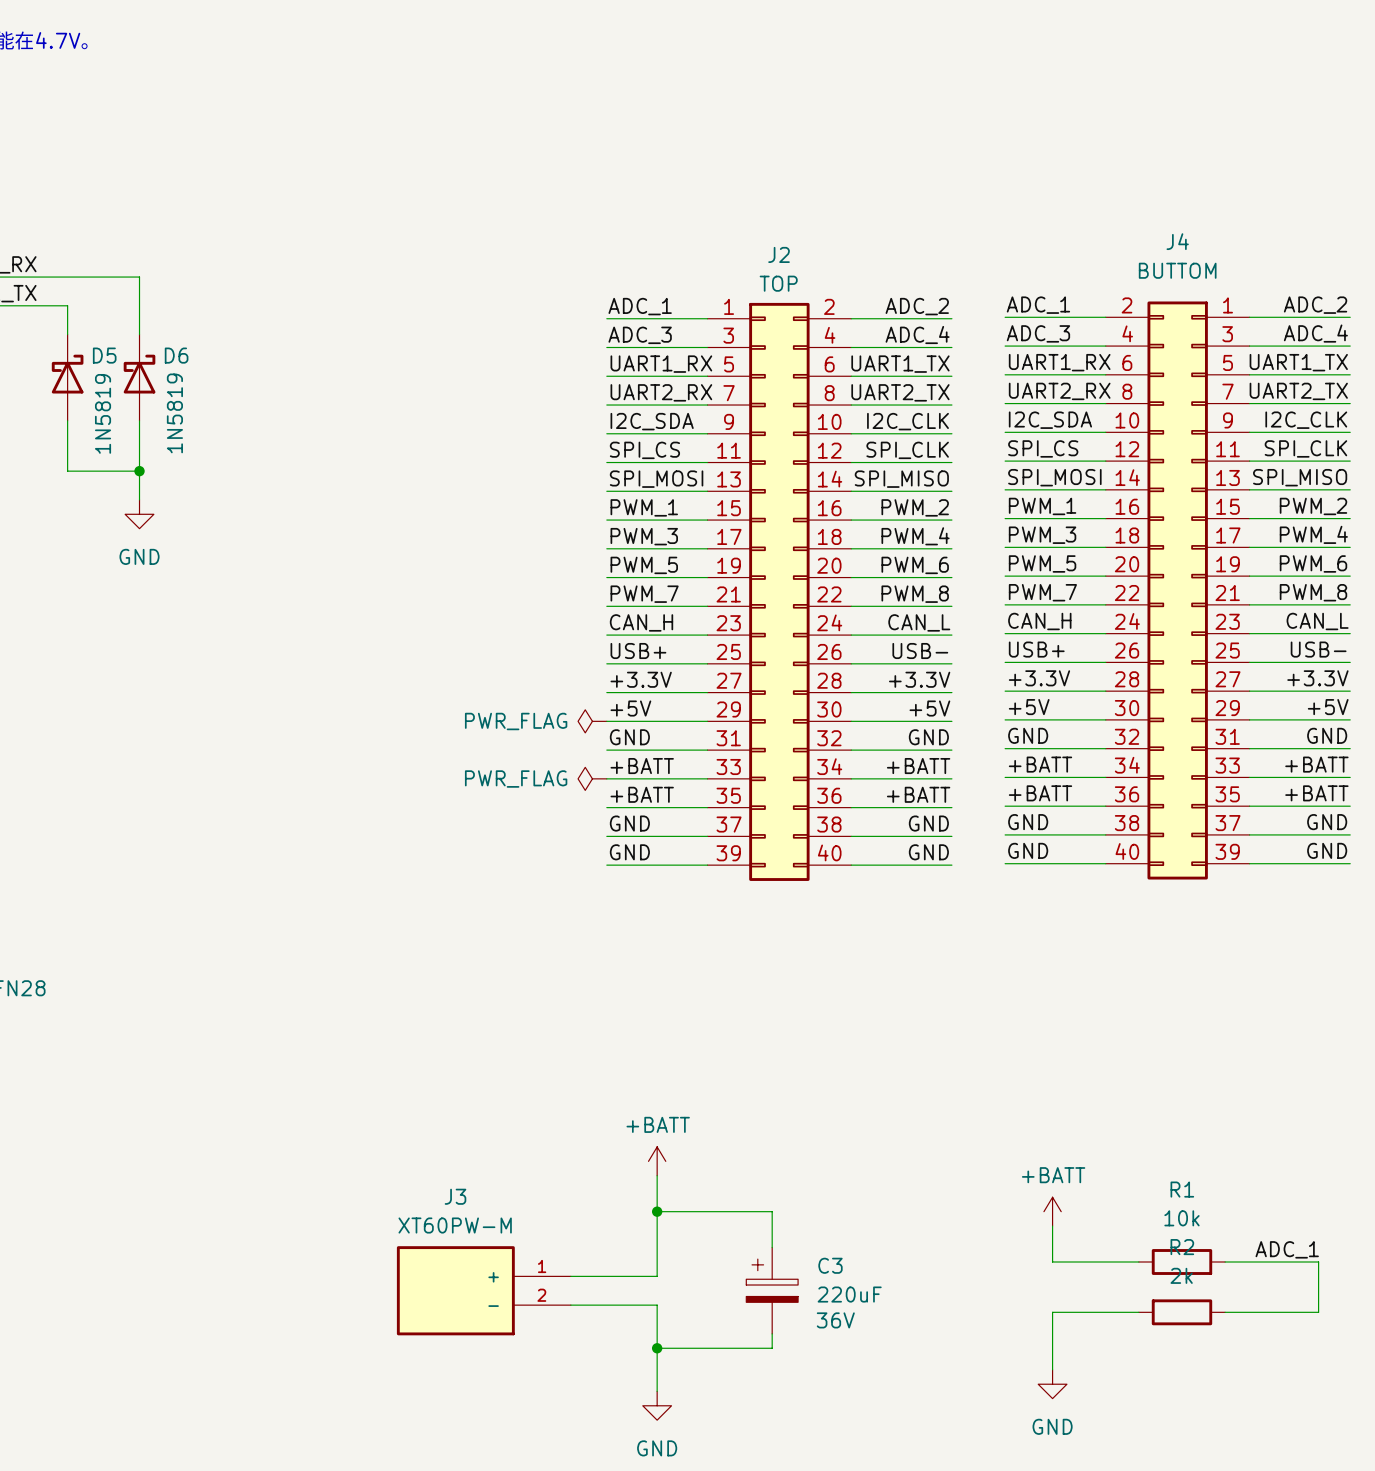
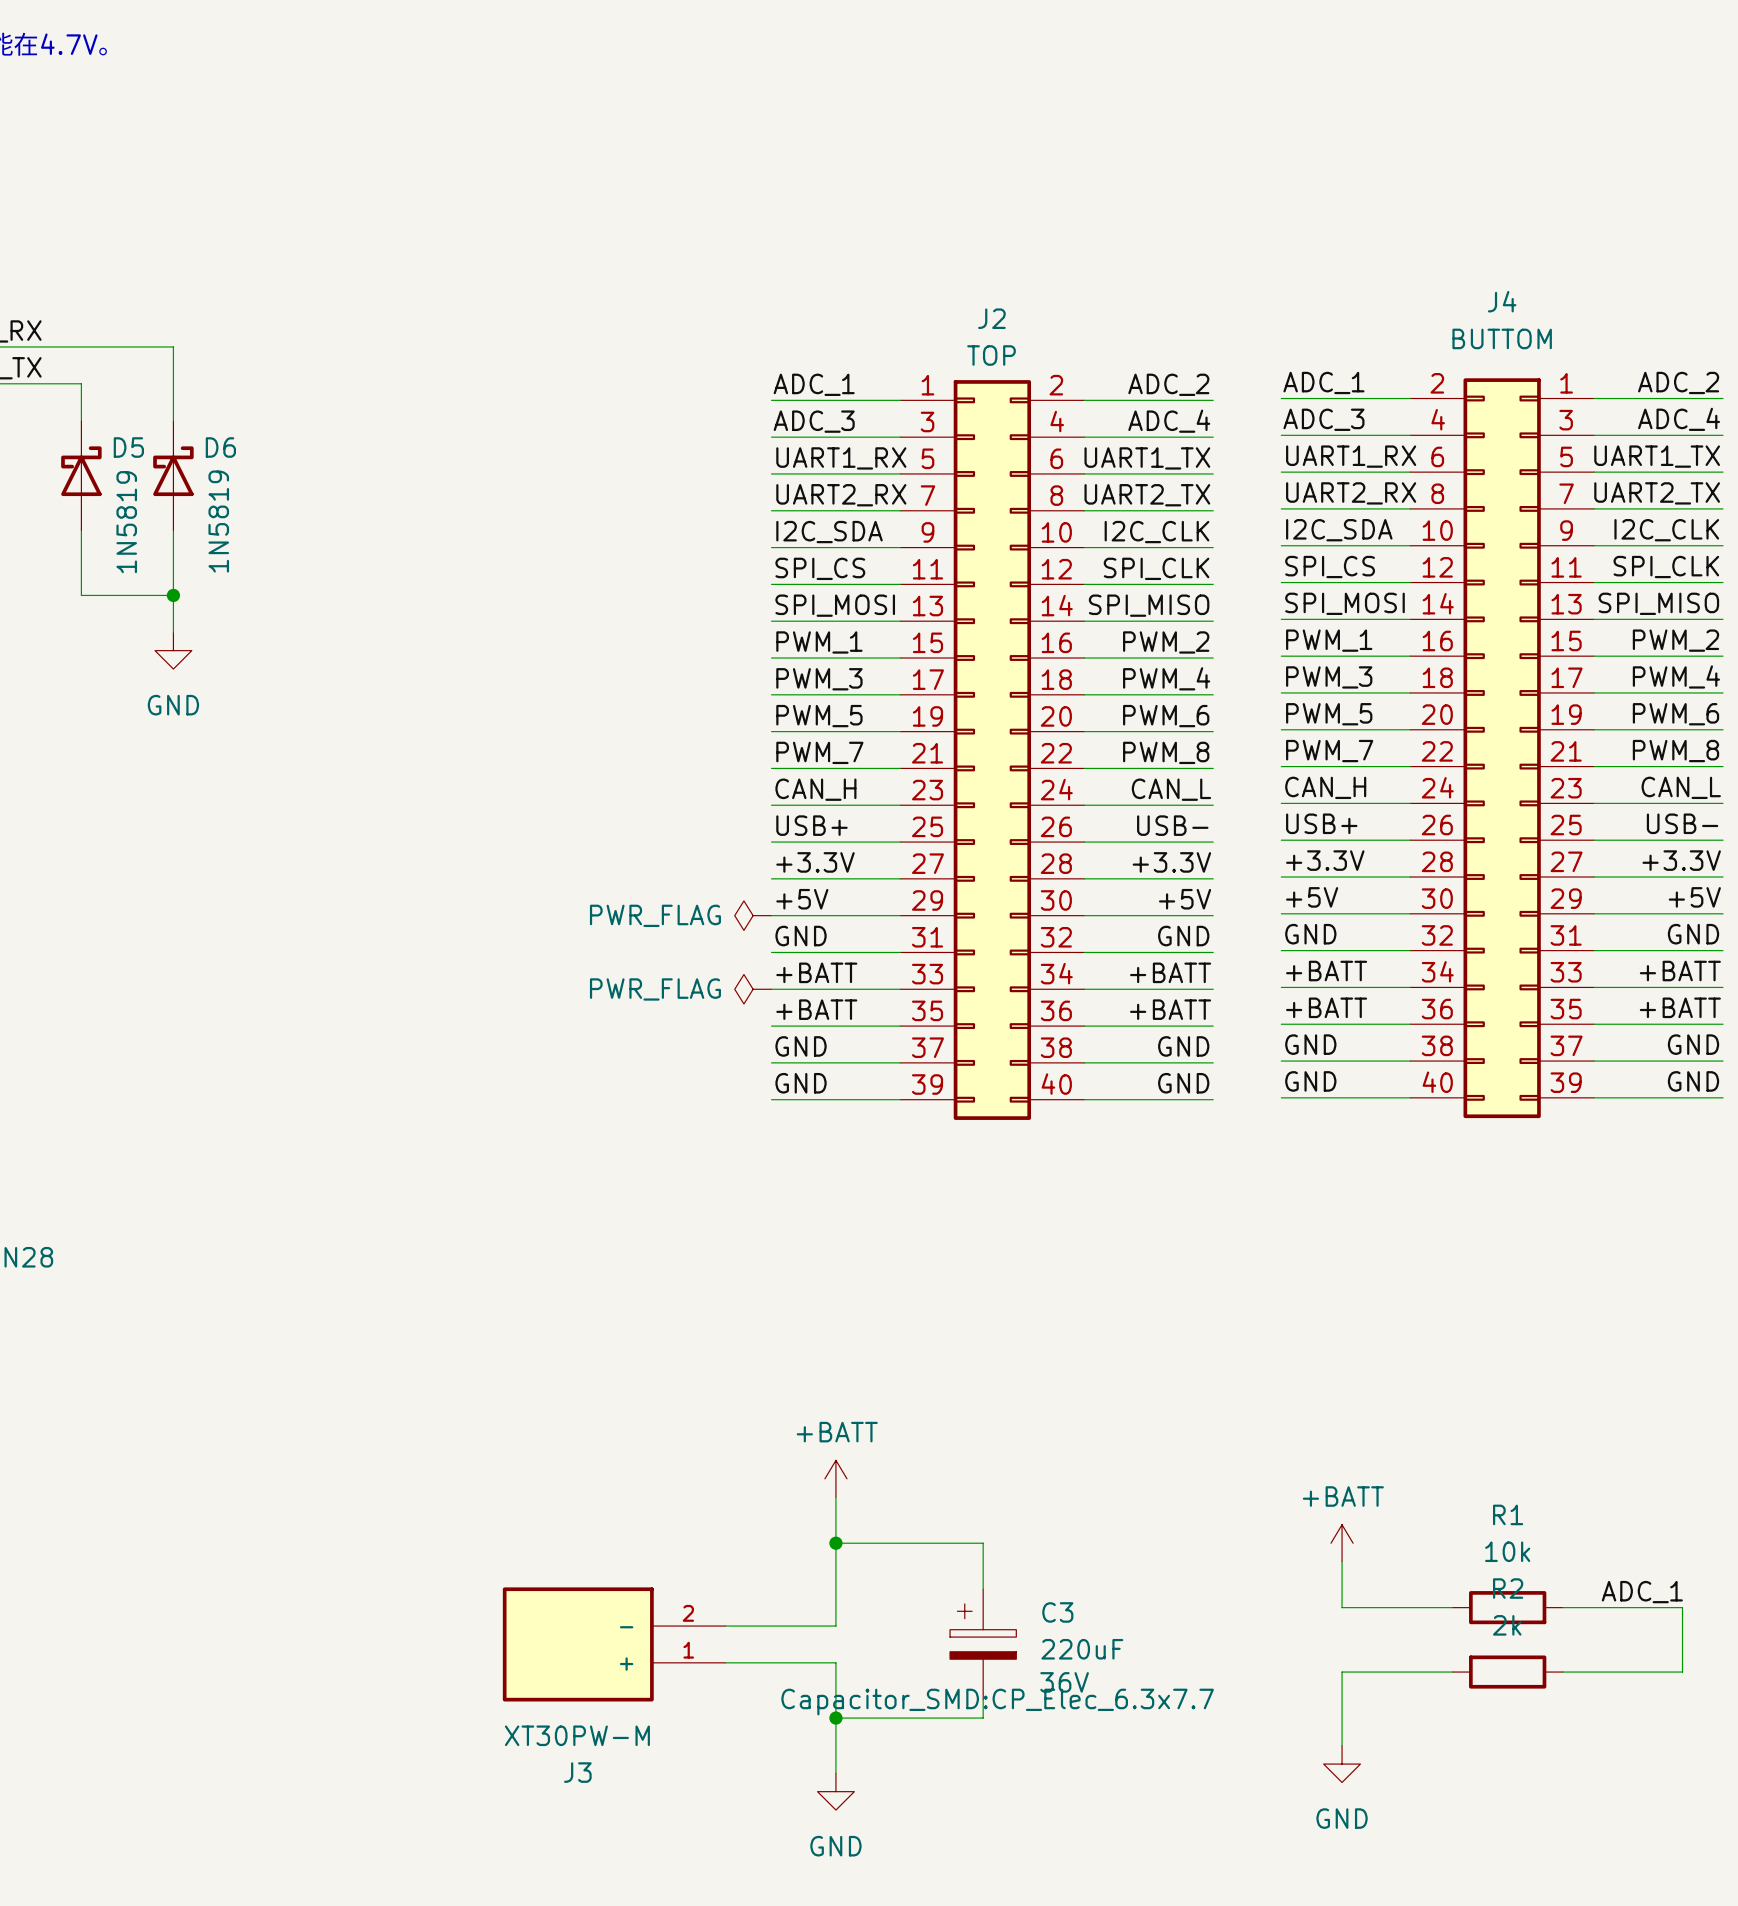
J3 value: XT60PW-M (455, 1225) -> XT30PW-M (577, 1735)
J3 flip: as is (455, 1290) -> up-down (578, 1644)
C3 text: none -> Capacitor_SMD:CP_Elec_6.3x7.7 (997, 1702)

